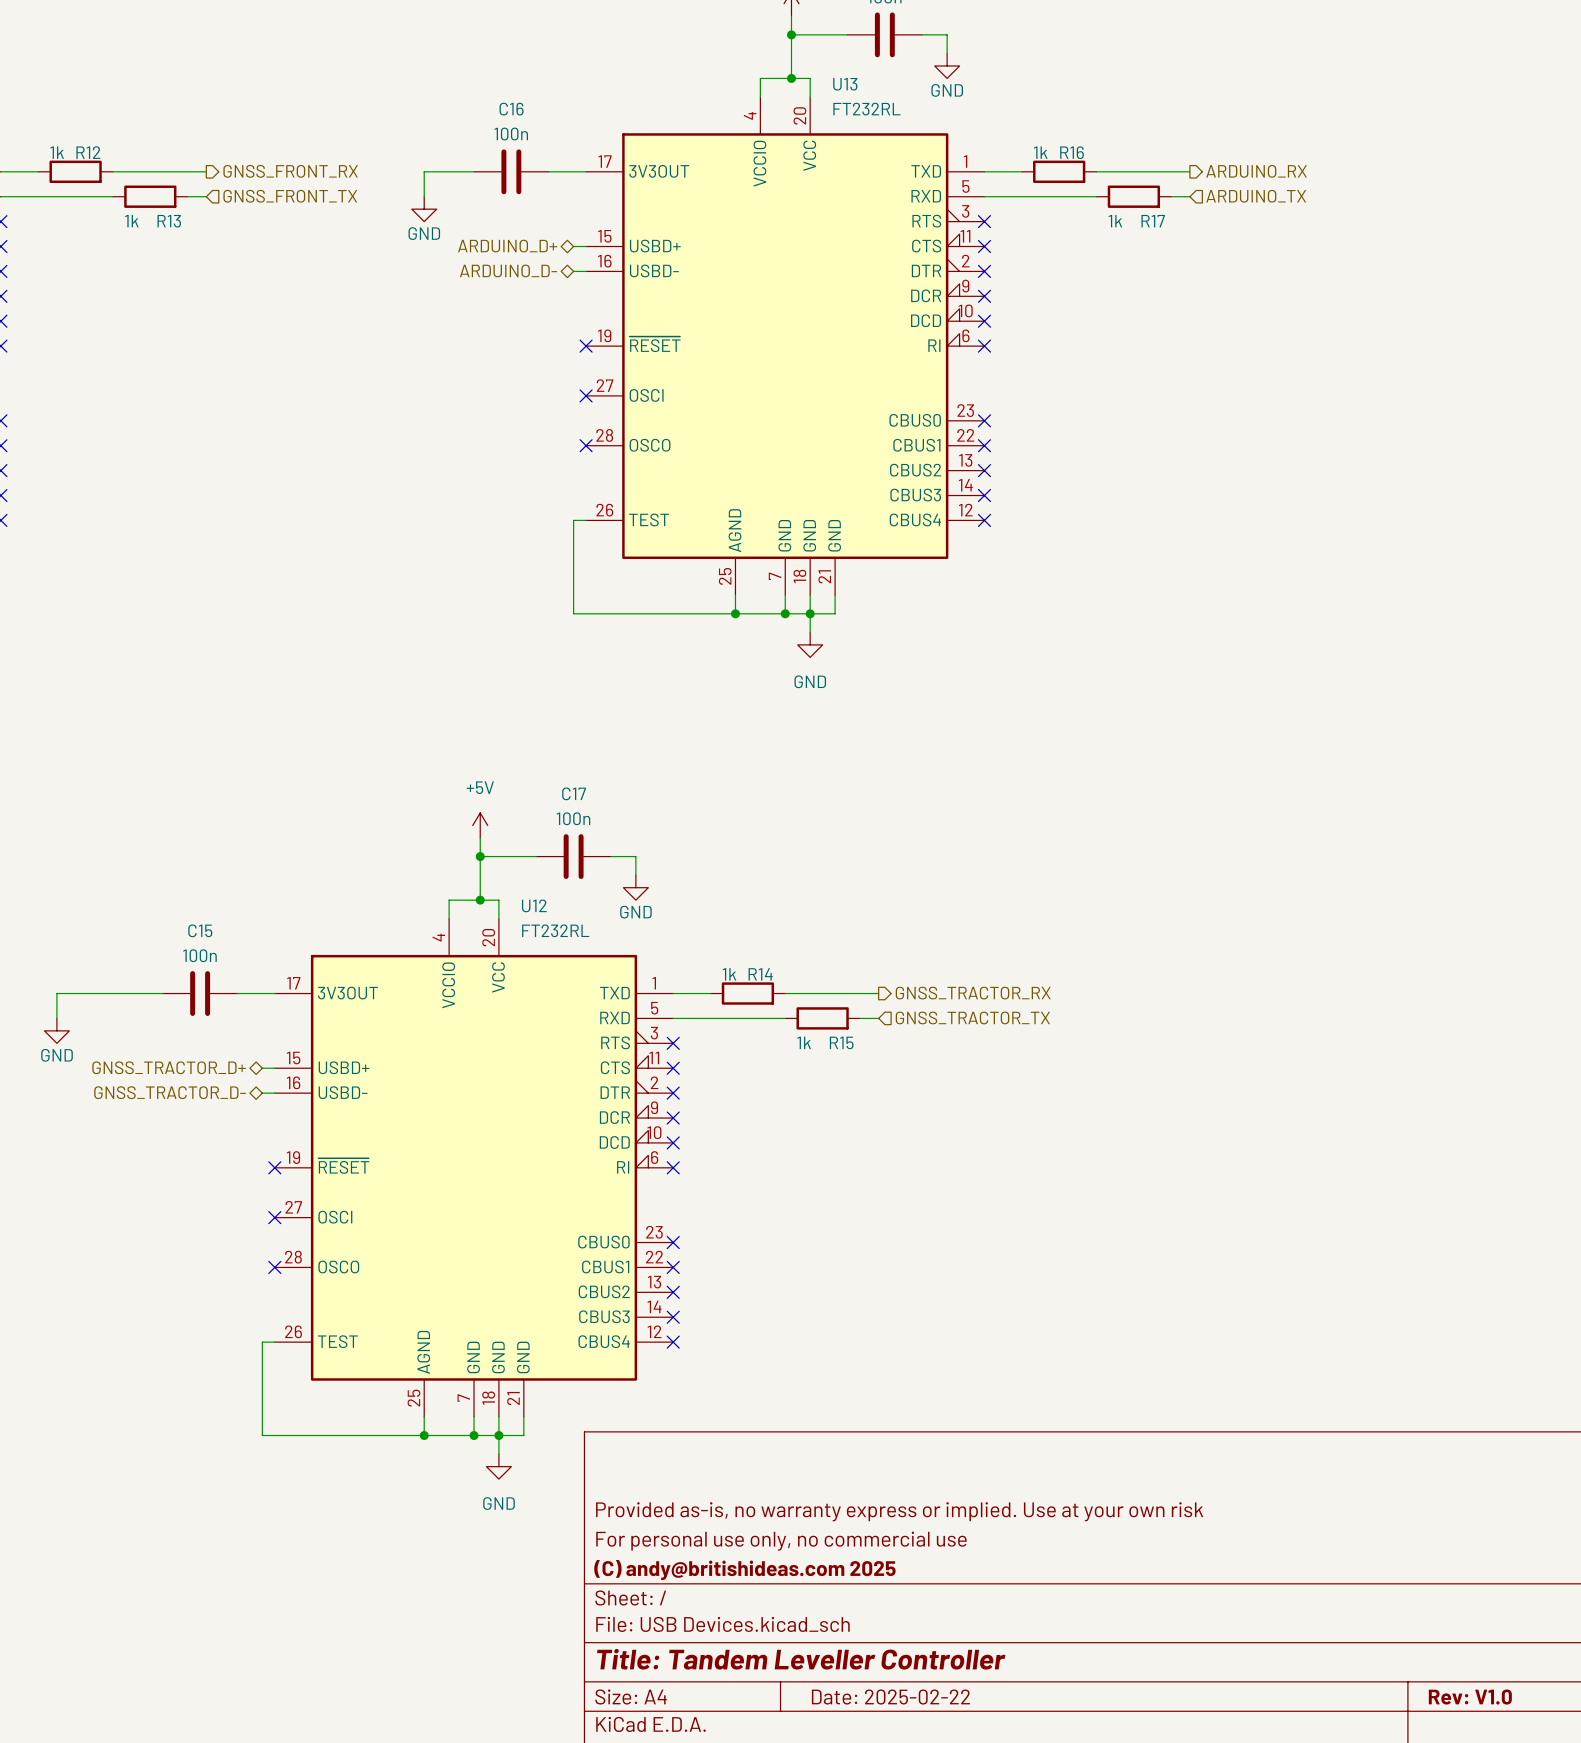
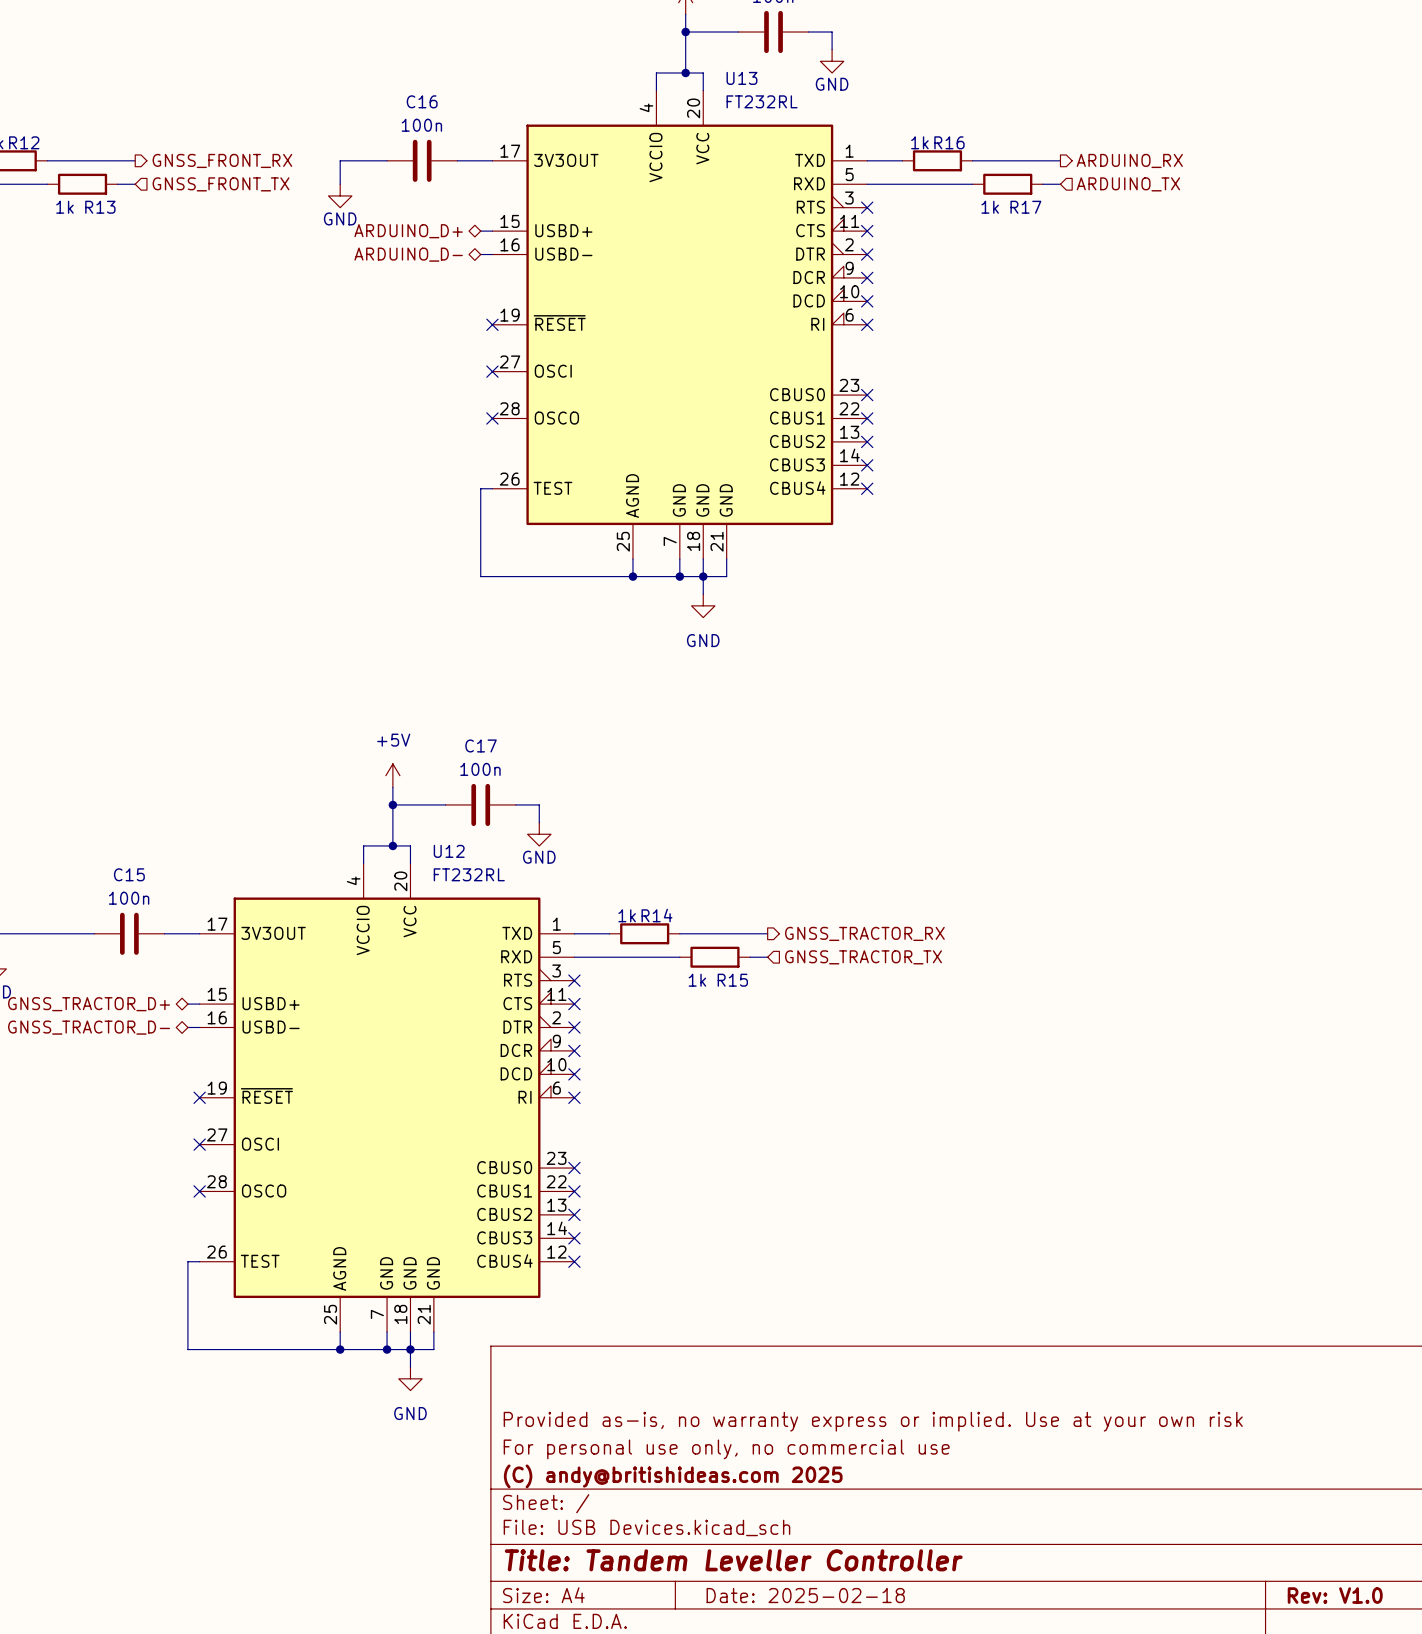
title block: Date: 2025-02-22 (890, 1697) -> Date: 2025-02-18 (805, 1595)

